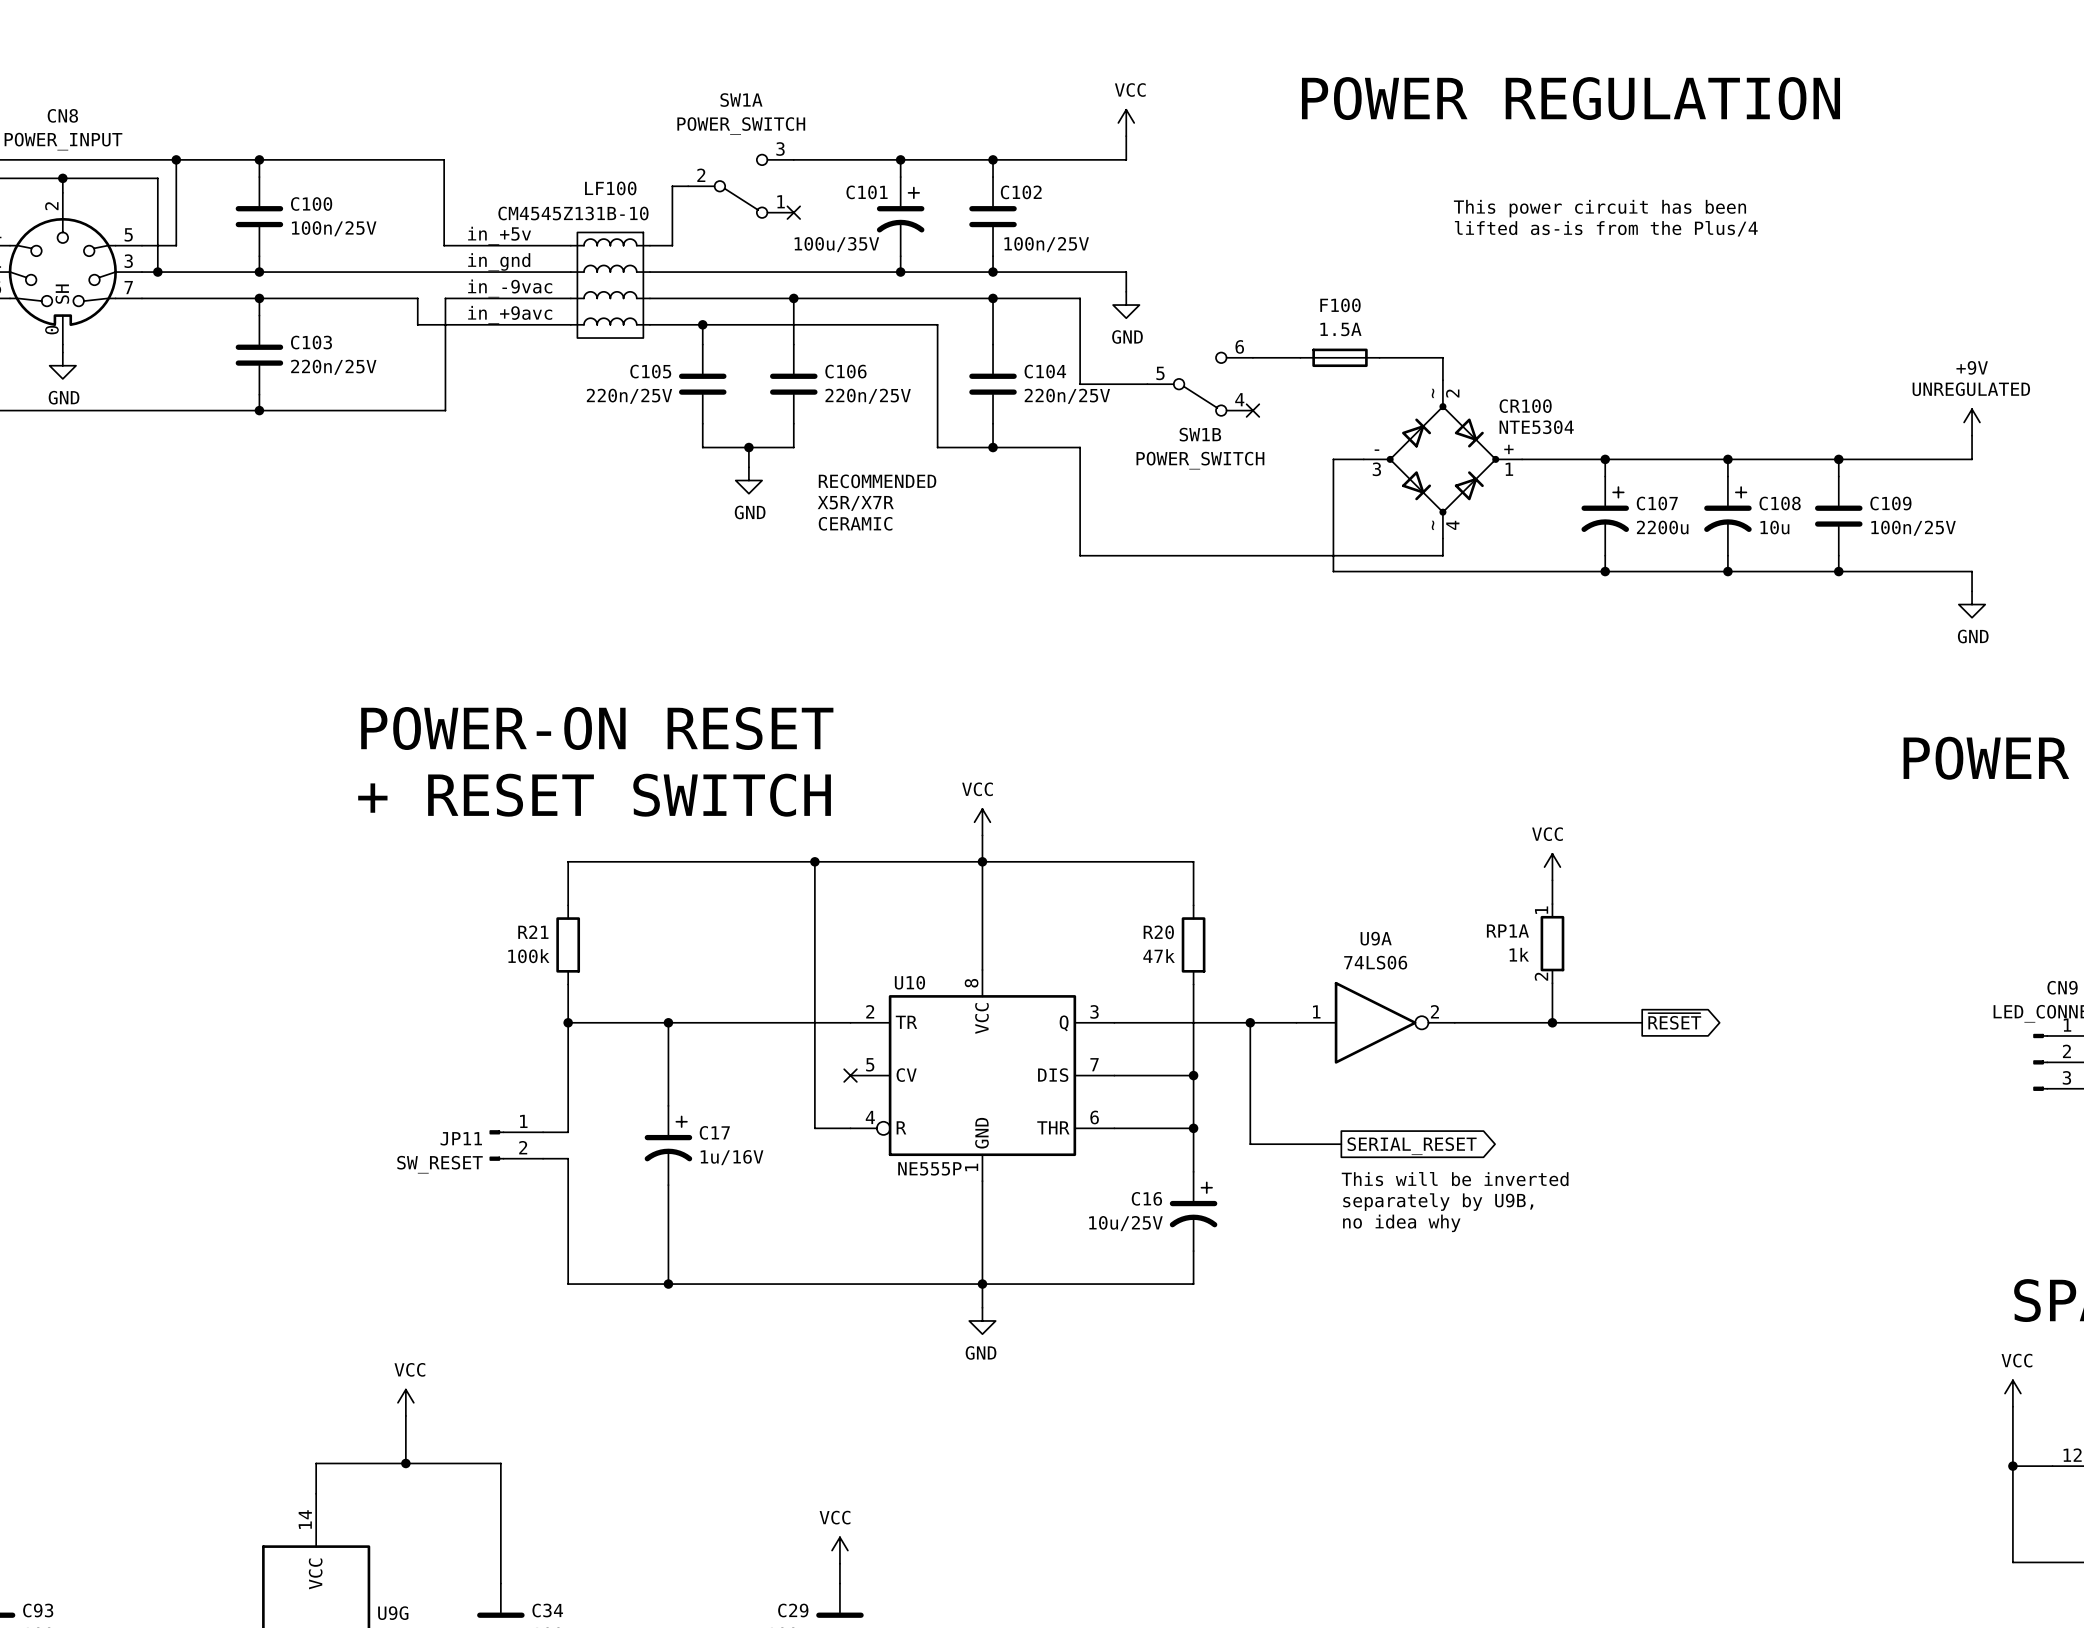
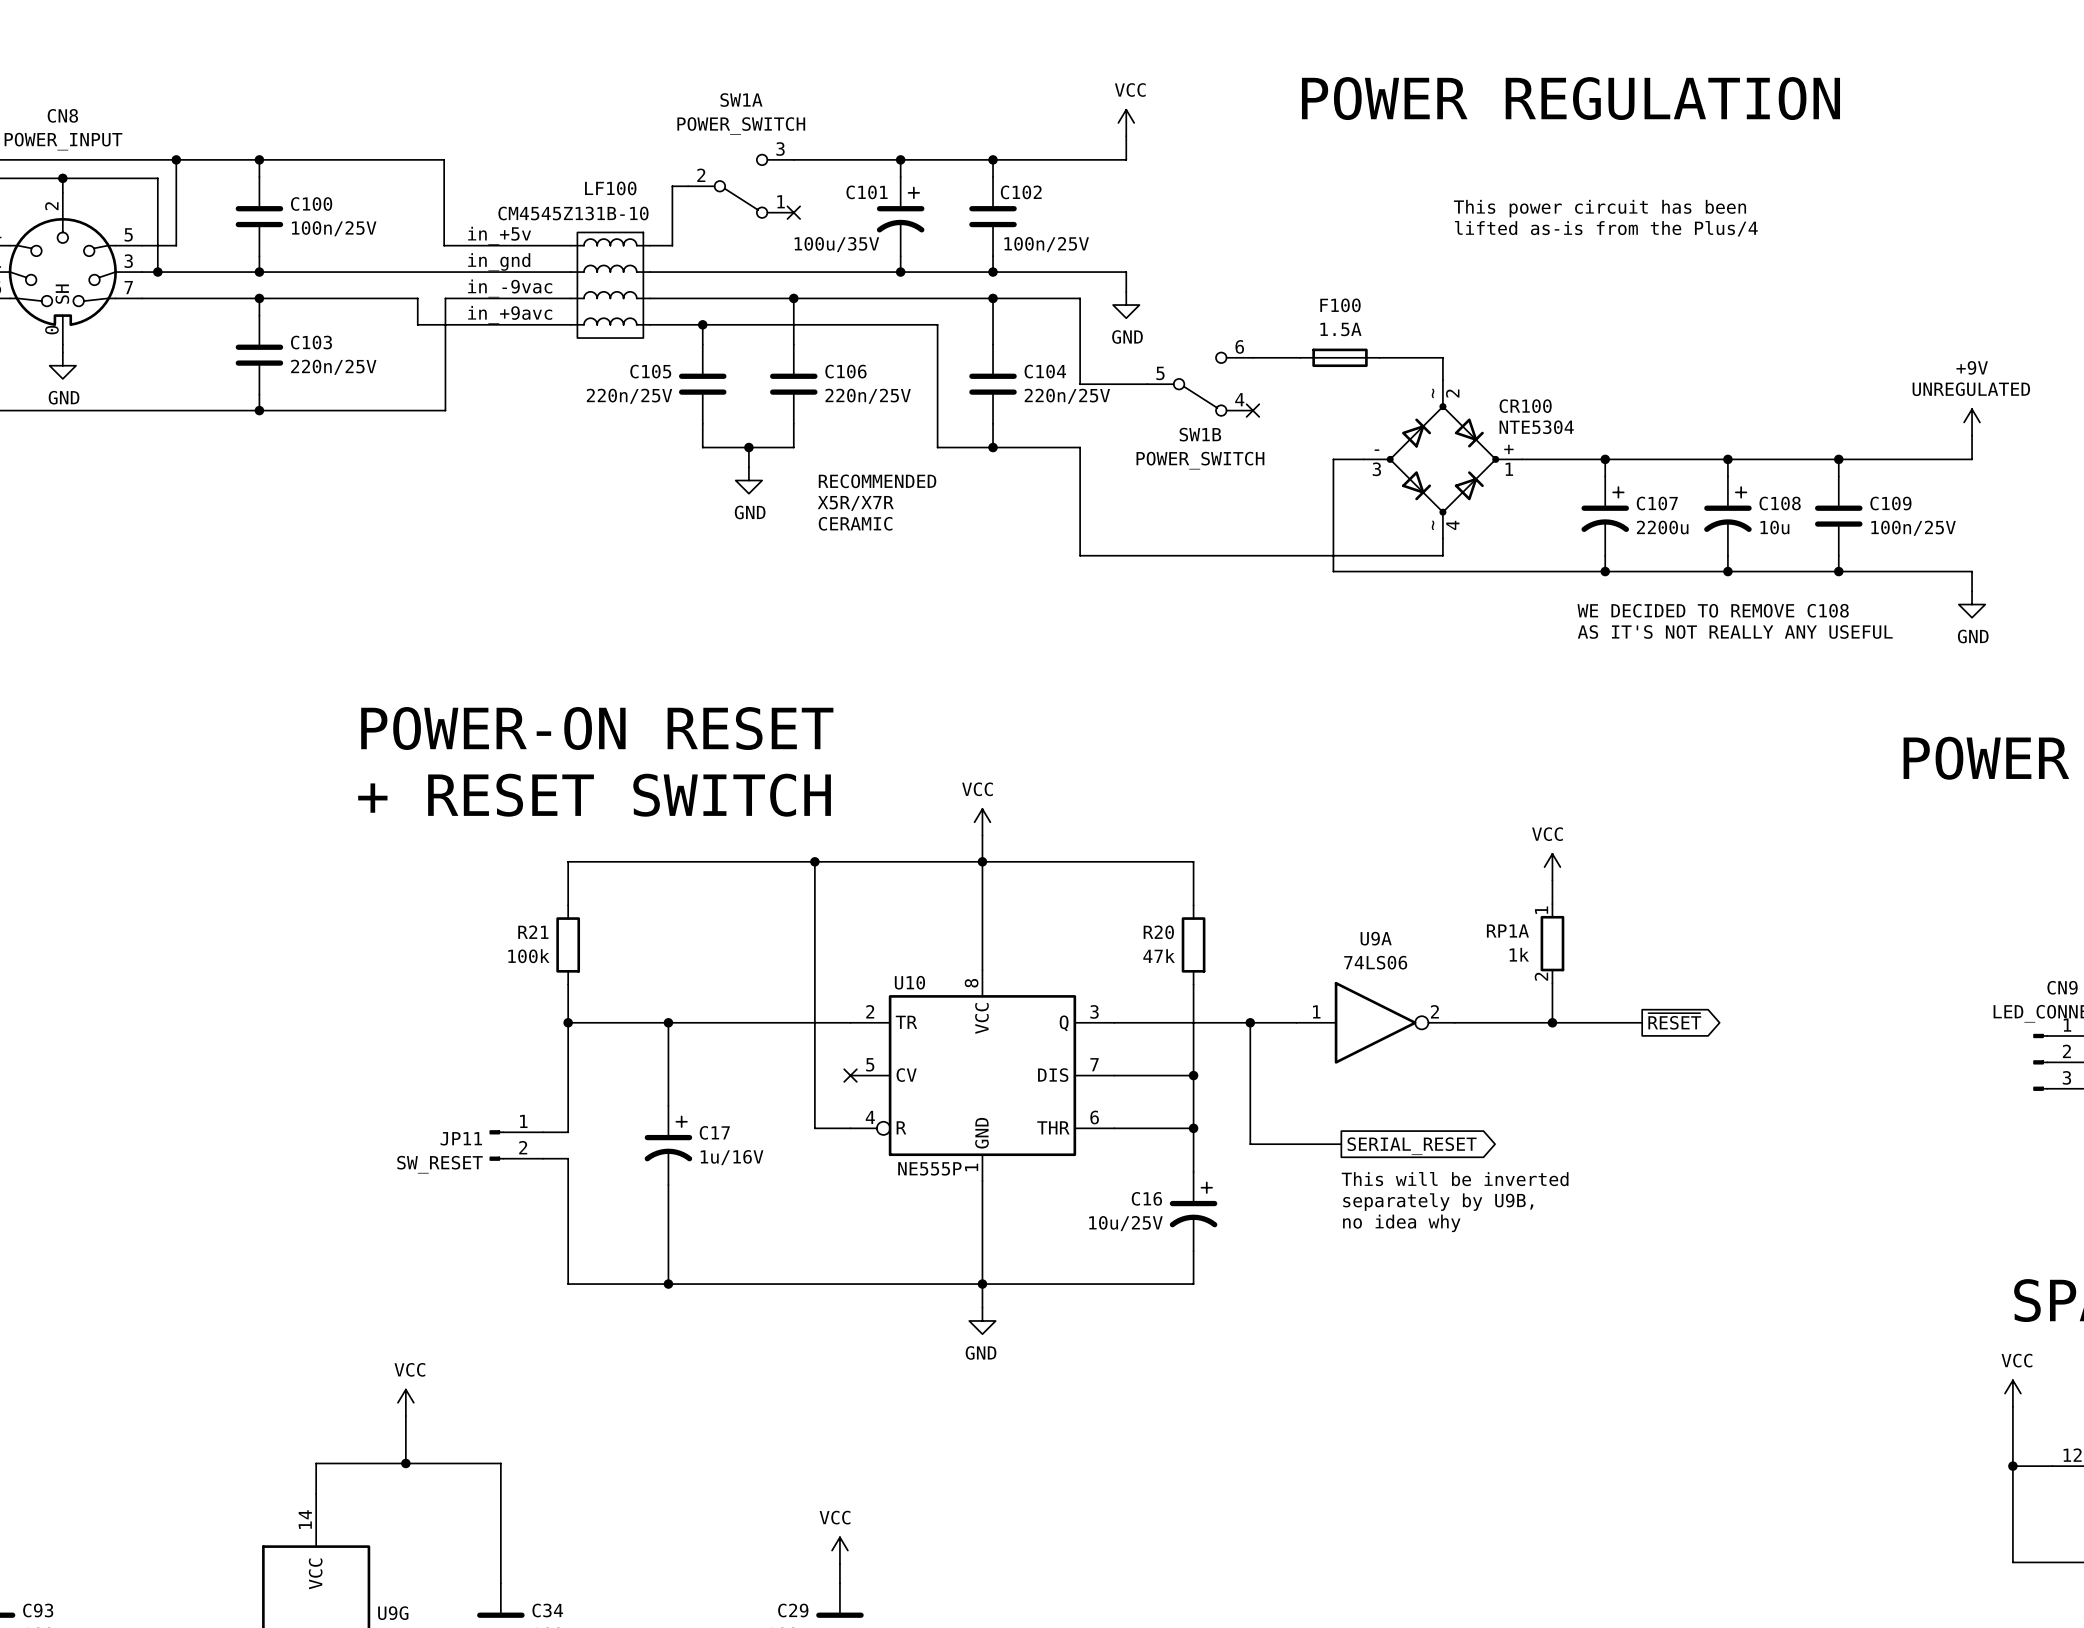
text: none -> WE DECIDED TO REMOVE C108 (1713, 610)
text: none -> AS IT'S NOT REALLY ANY USEFUL (1735, 632)

